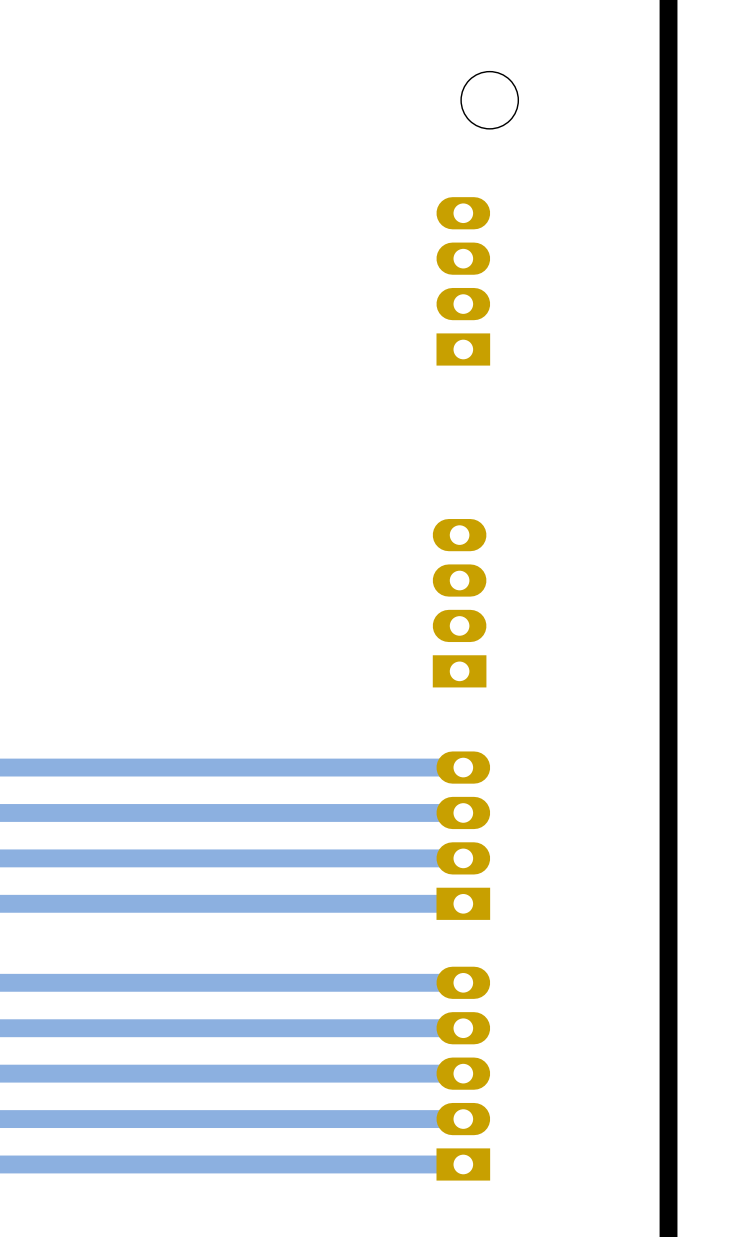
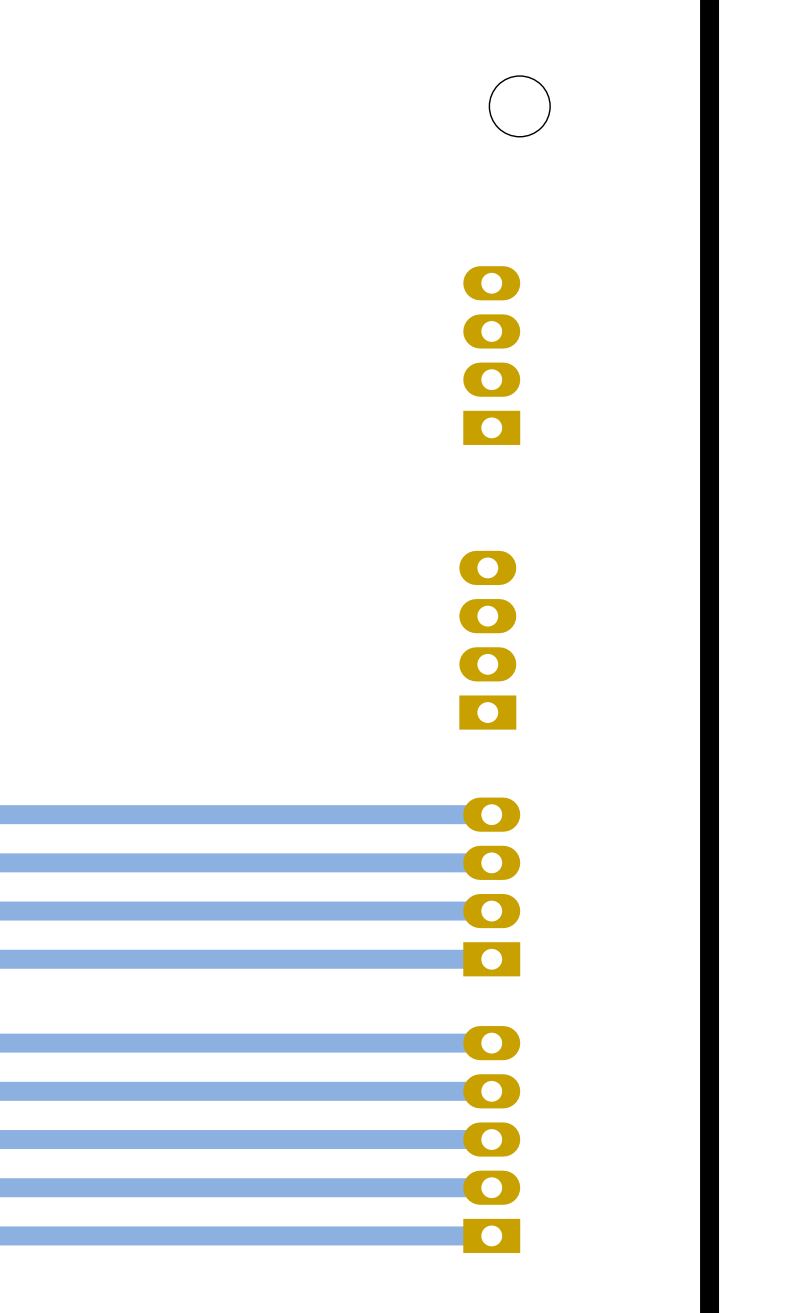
part position: (463, 281) -> (491, 355)

